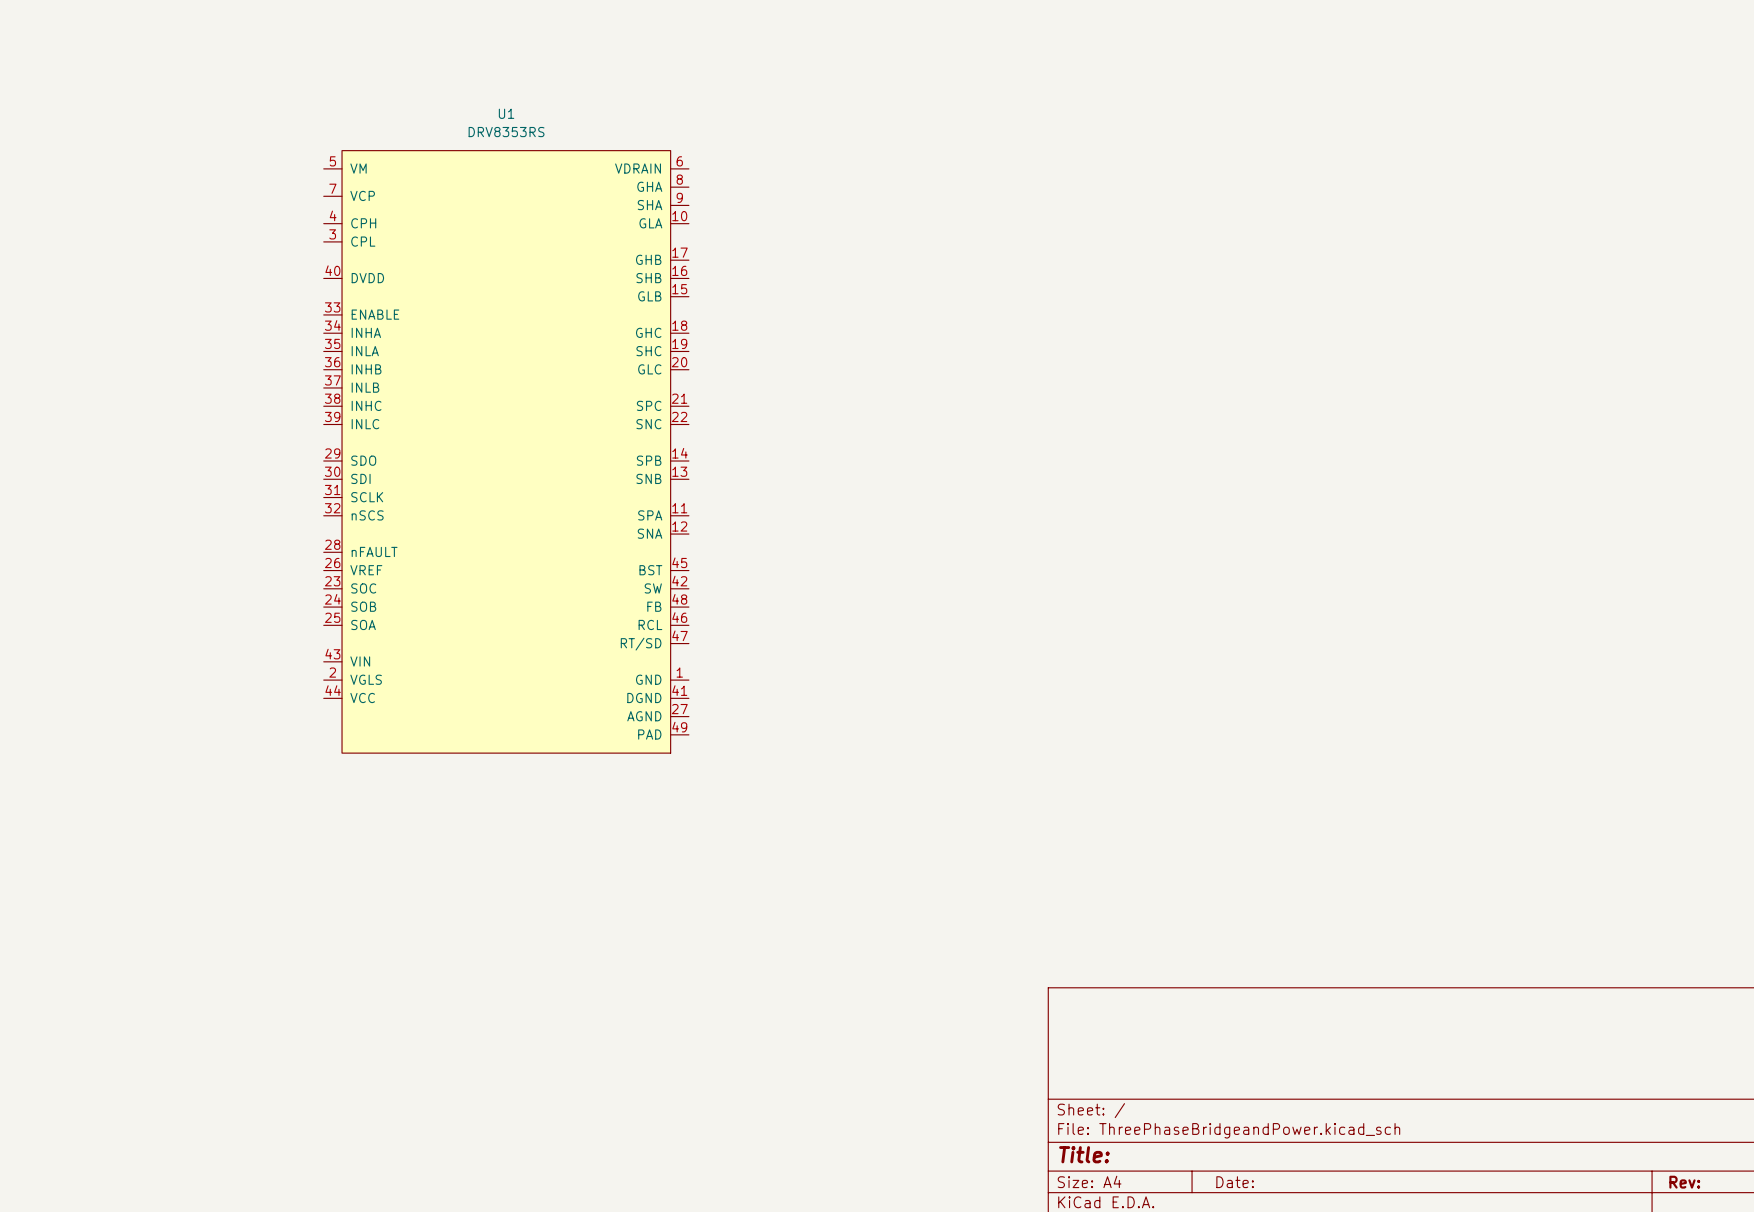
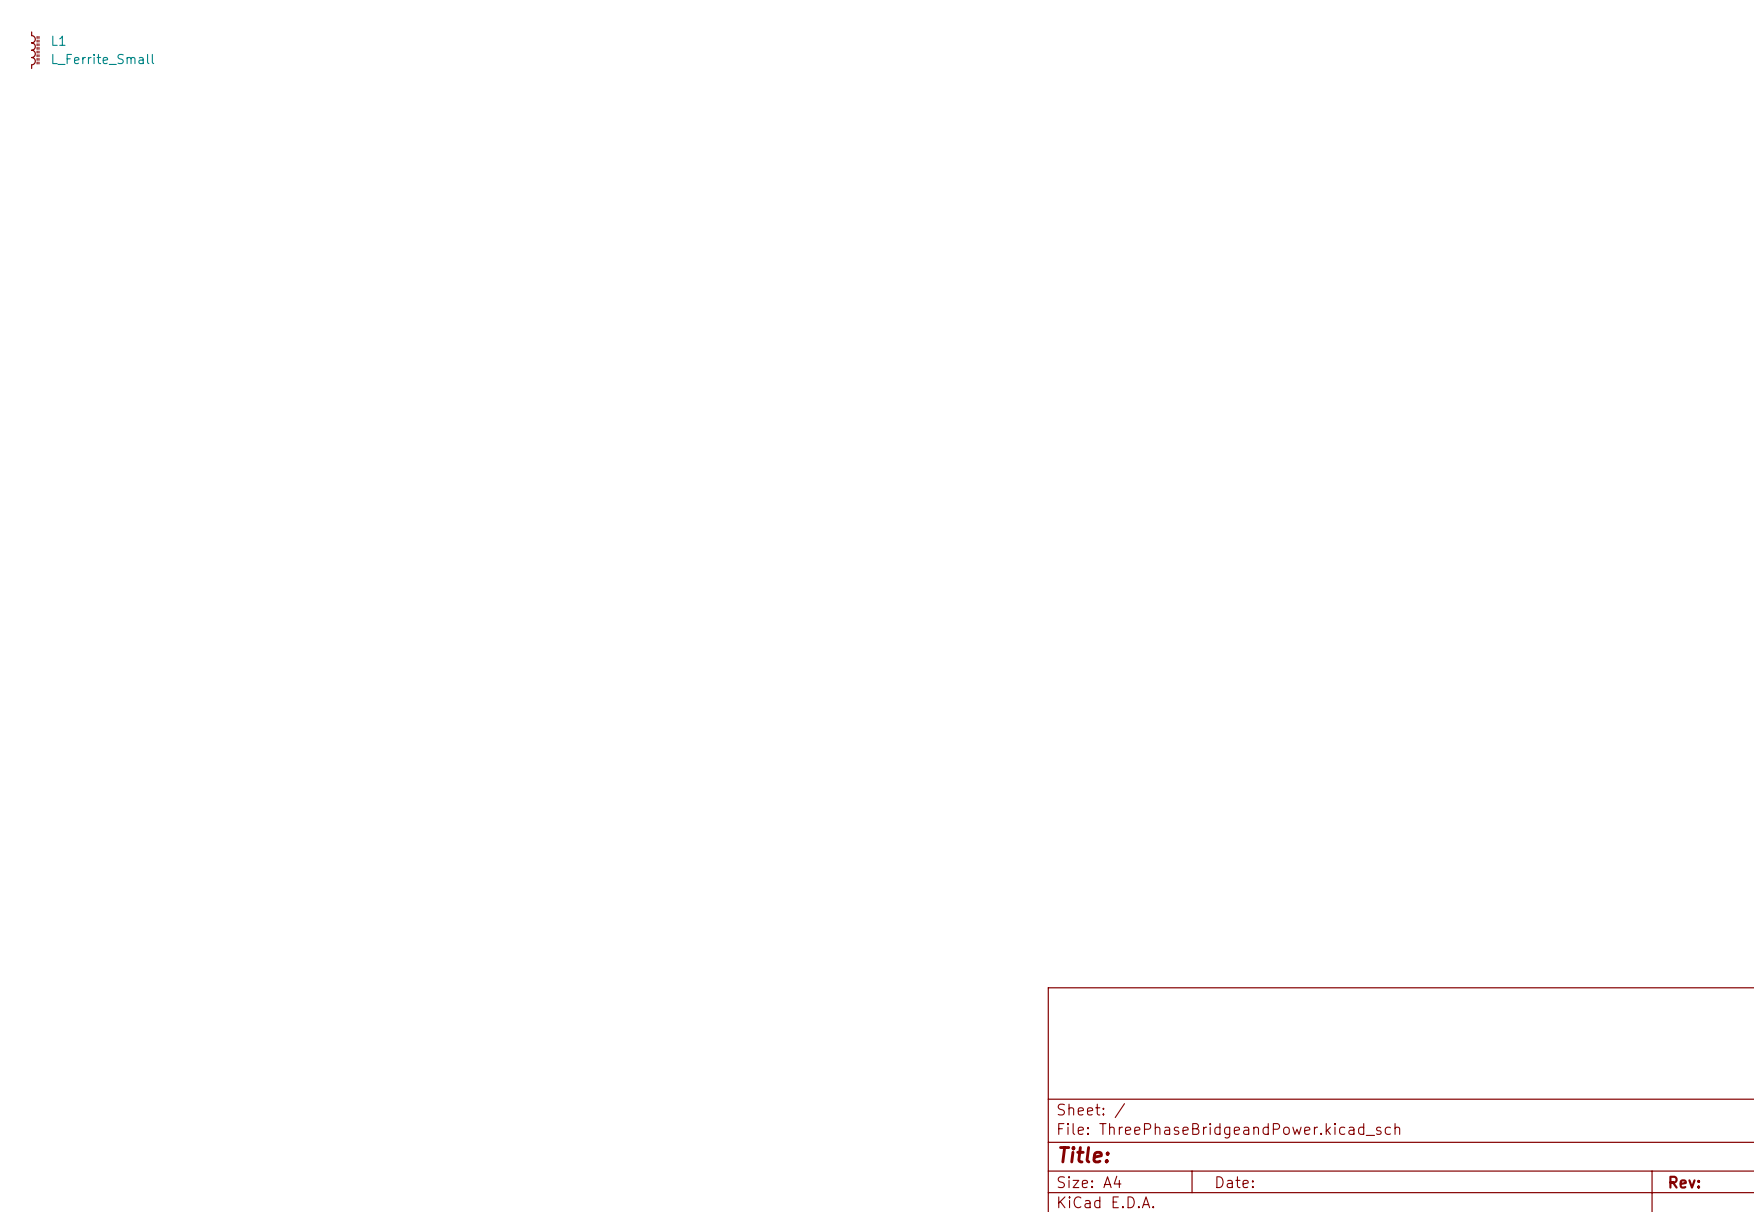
L1: none -> L_Ferrite_Small (35, 50)
U1: DRV8353RS (506, 451) -> none

